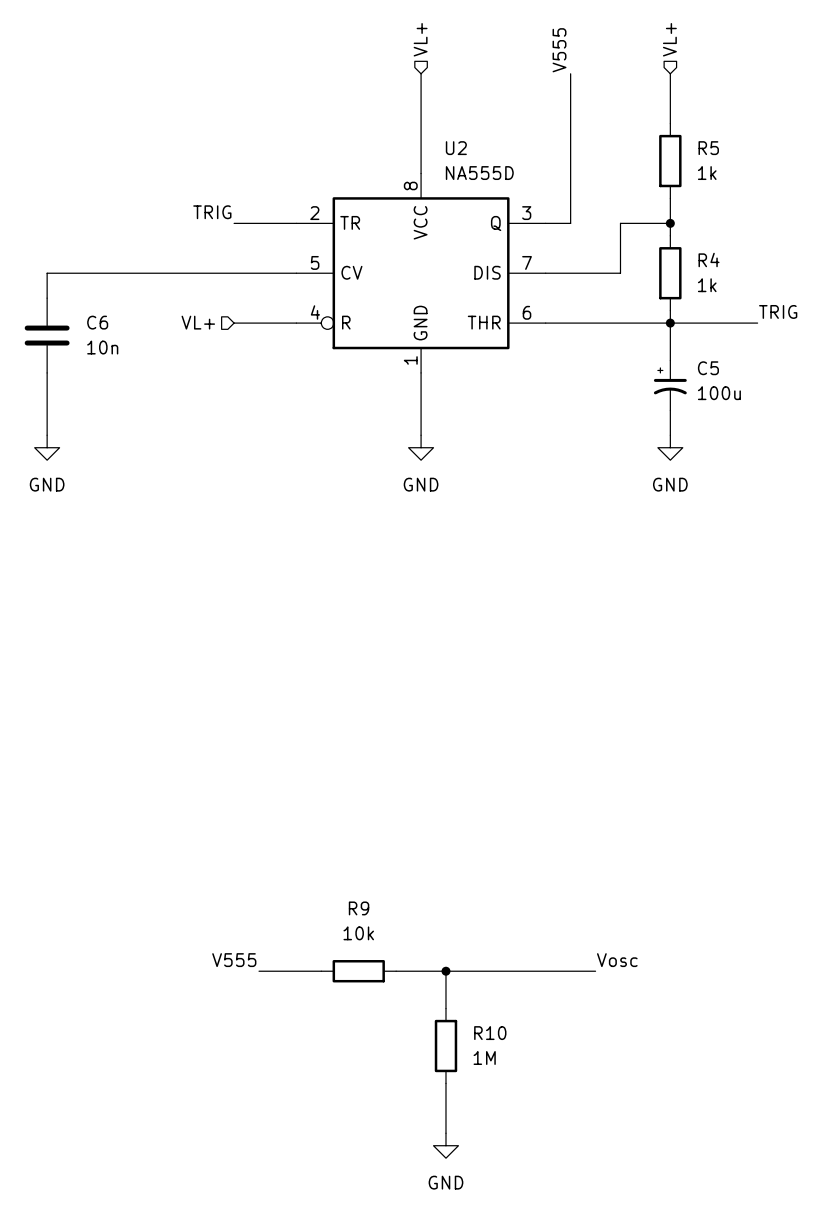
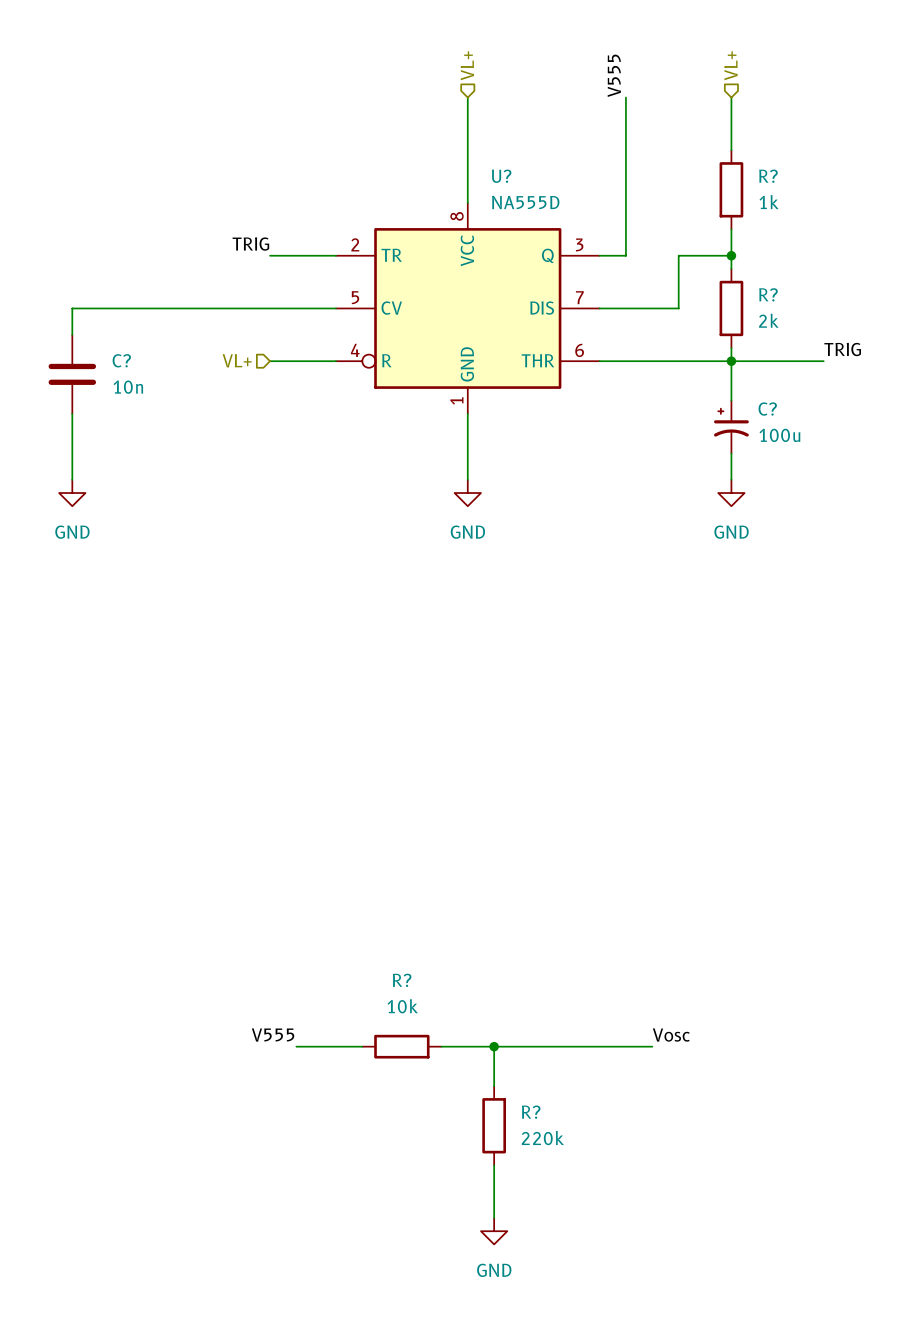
U2 name: U2 (456, 148) -> U? (501, 176)
R5 name: R5 (708, 148) -> R? (768, 176)
R4 name: R4 (709, 260) -> R? (768, 294)
R4 value: 1k (707, 285) -> 2k (768, 320)
C6 name: C6 (97, 322) -> C? (121, 360)
C5 name: C5 (708, 368) -> C? (767, 409)
R9 name: R9 (359, 908) -> R? (402, 980)
R10 name: R10 (490, 1033) -> R? (531, 1112)
R10 value: 1M (484, 1058) -> 220k (542, 1138)

